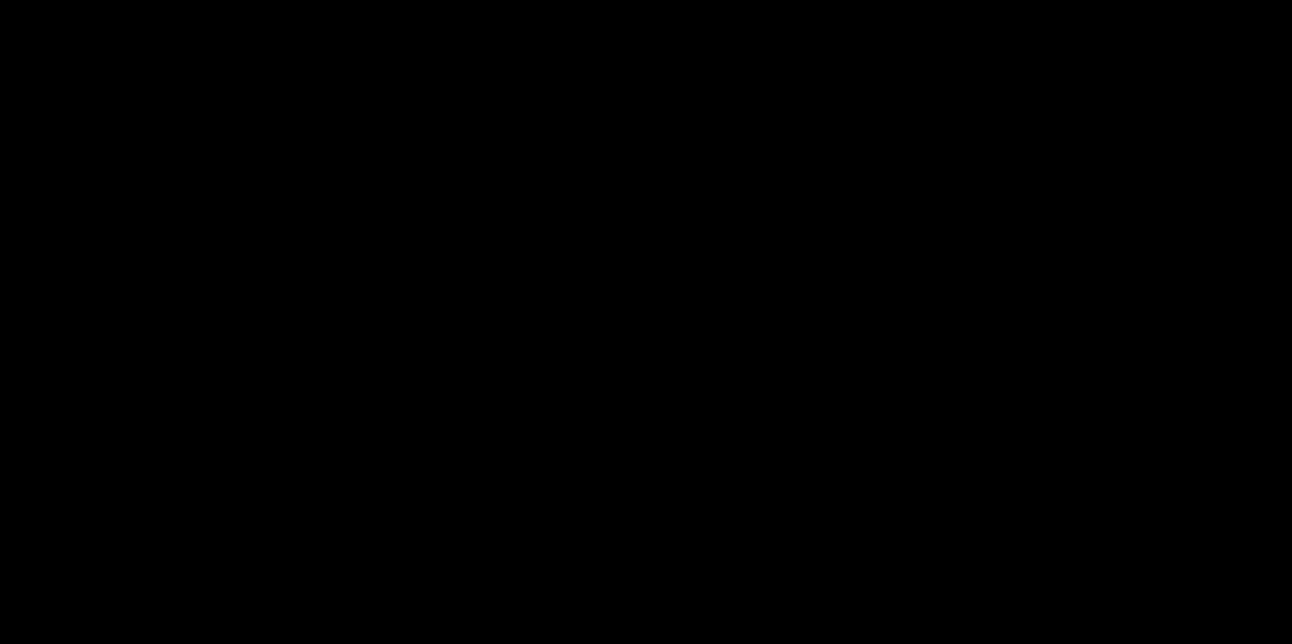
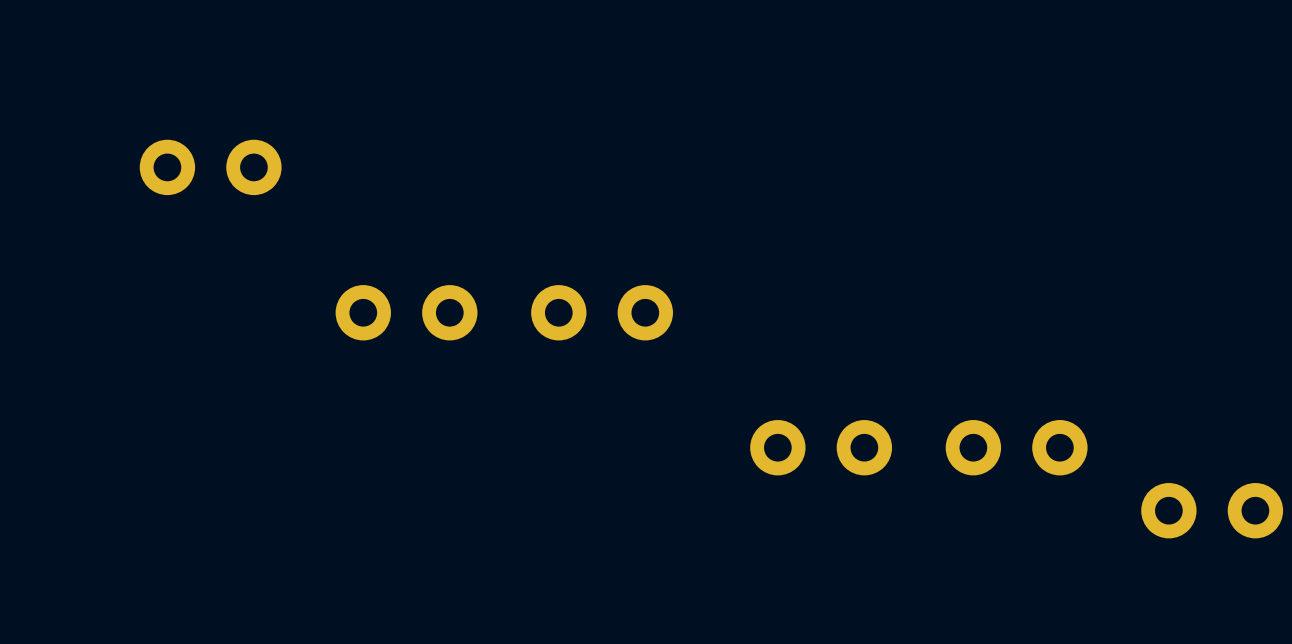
part: none -> (210, 167)
part: none -> (406, 312)
part: none -> (602, 312)
part: none -> (821, 447)
part: none -> (1016, 447)
part: none -> (1212, 510)

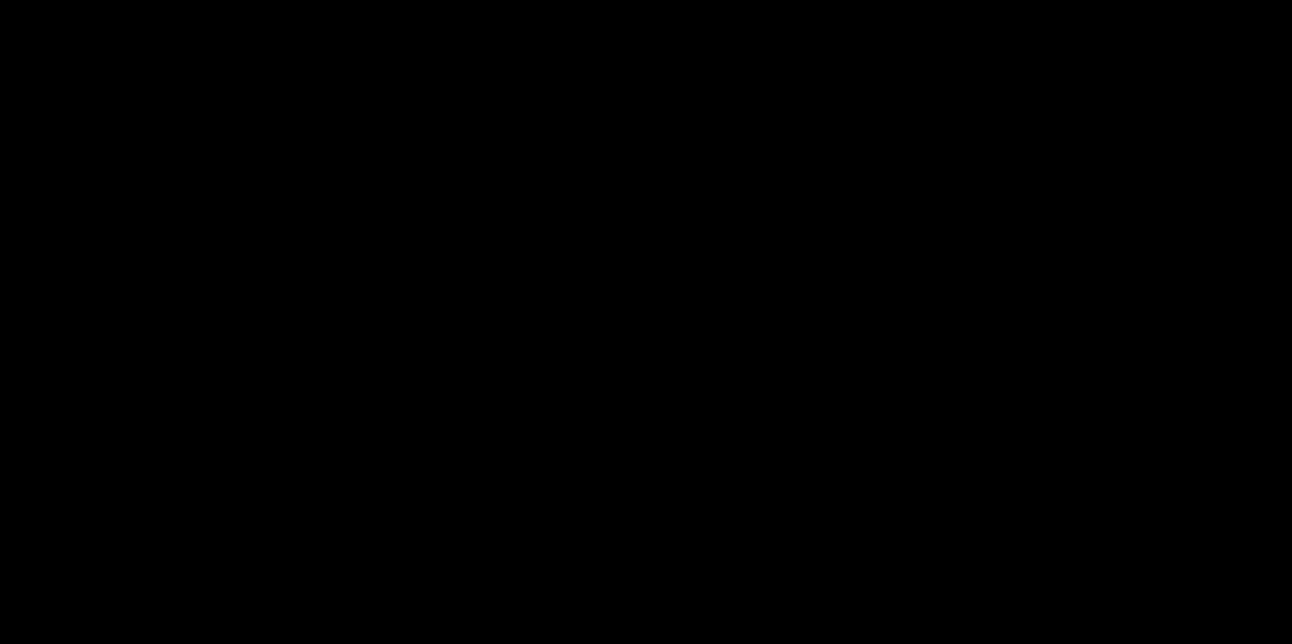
part: (210, 167) -> none
part: (406, 312) -> none
part: (602, 312) -> none
part: (821, 447) -> none
part: (1016, 447) -> none
part: (1212, 510) -> none

